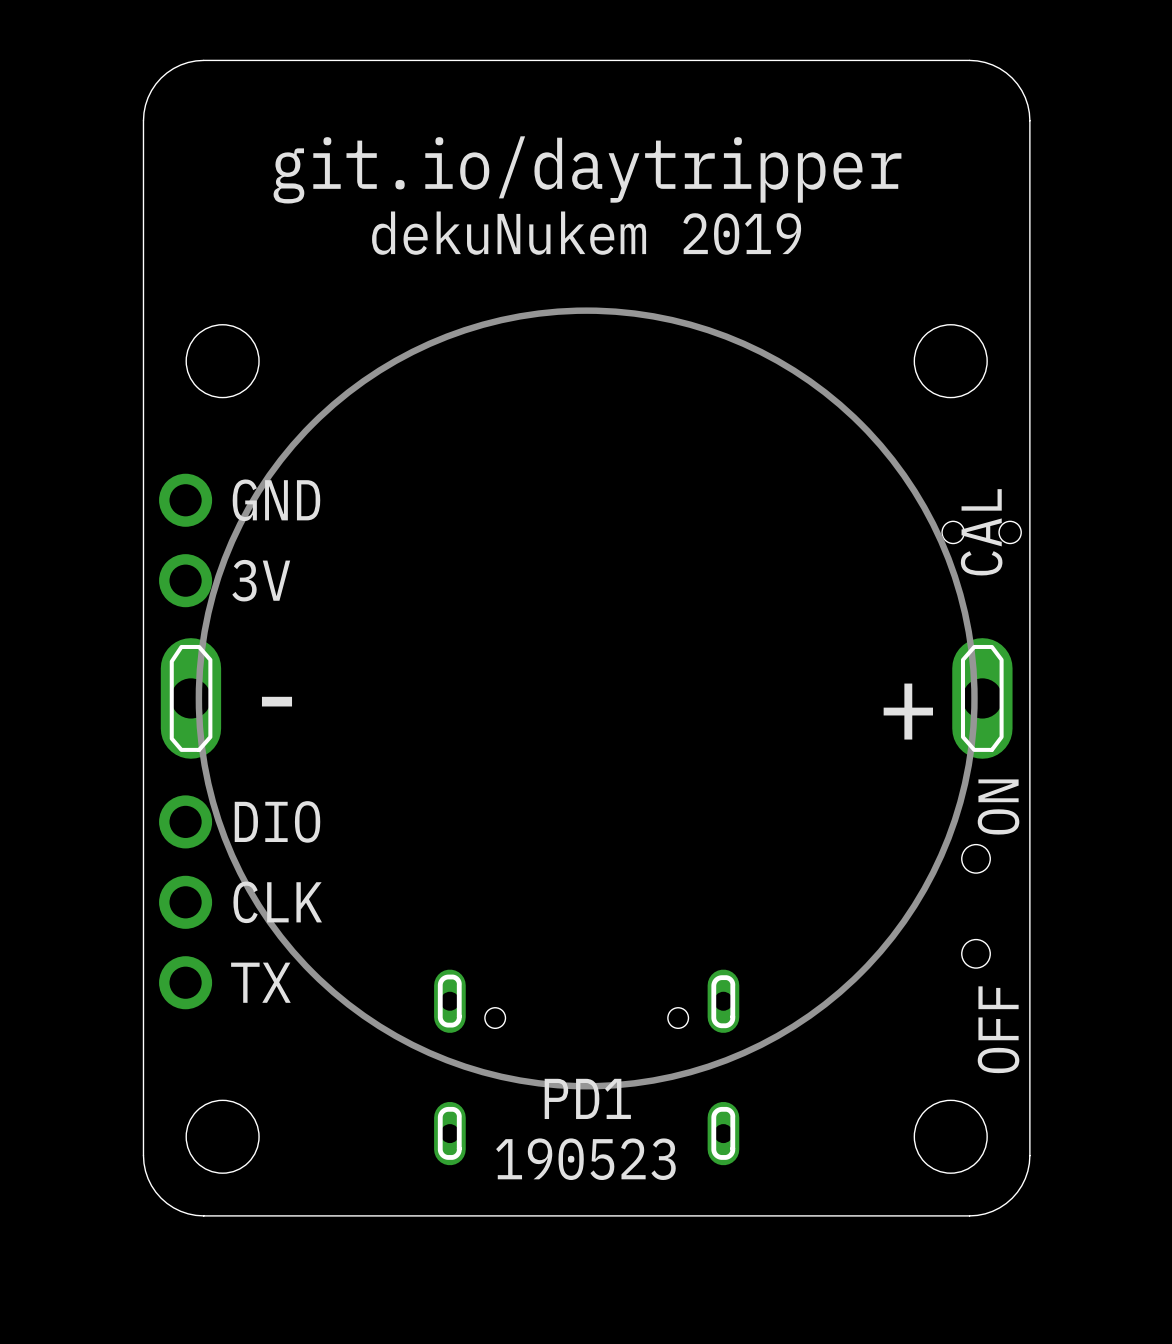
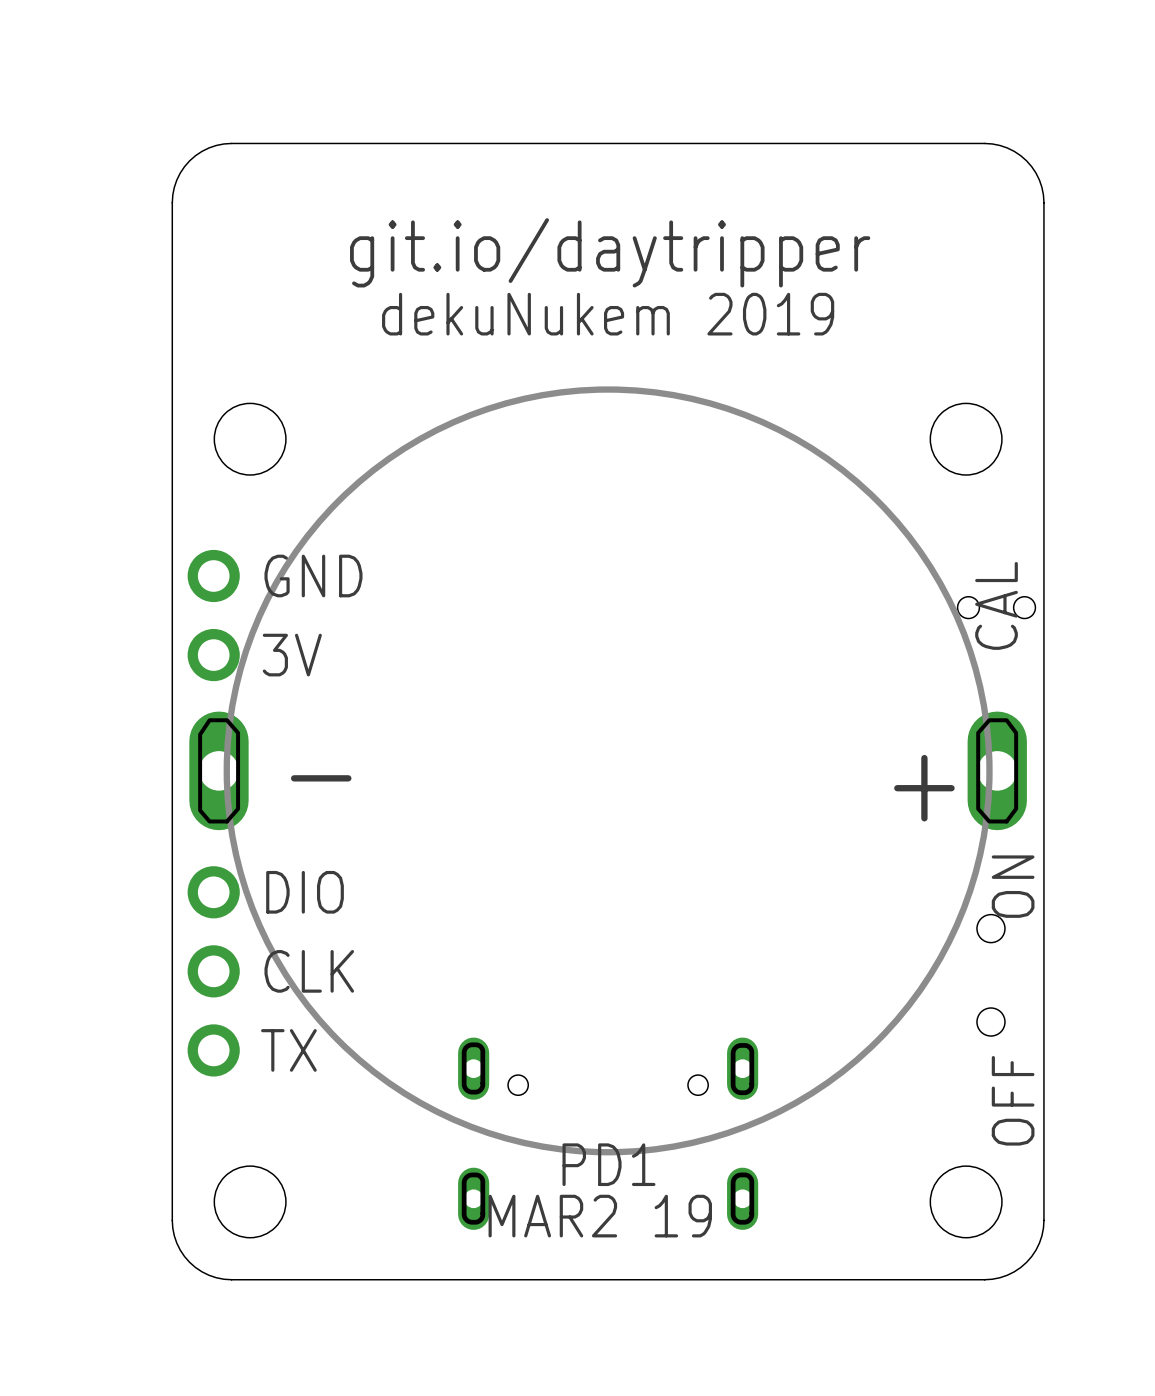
text: 190523 (585, 1159) -> MAR2 19 (600, 1216)

